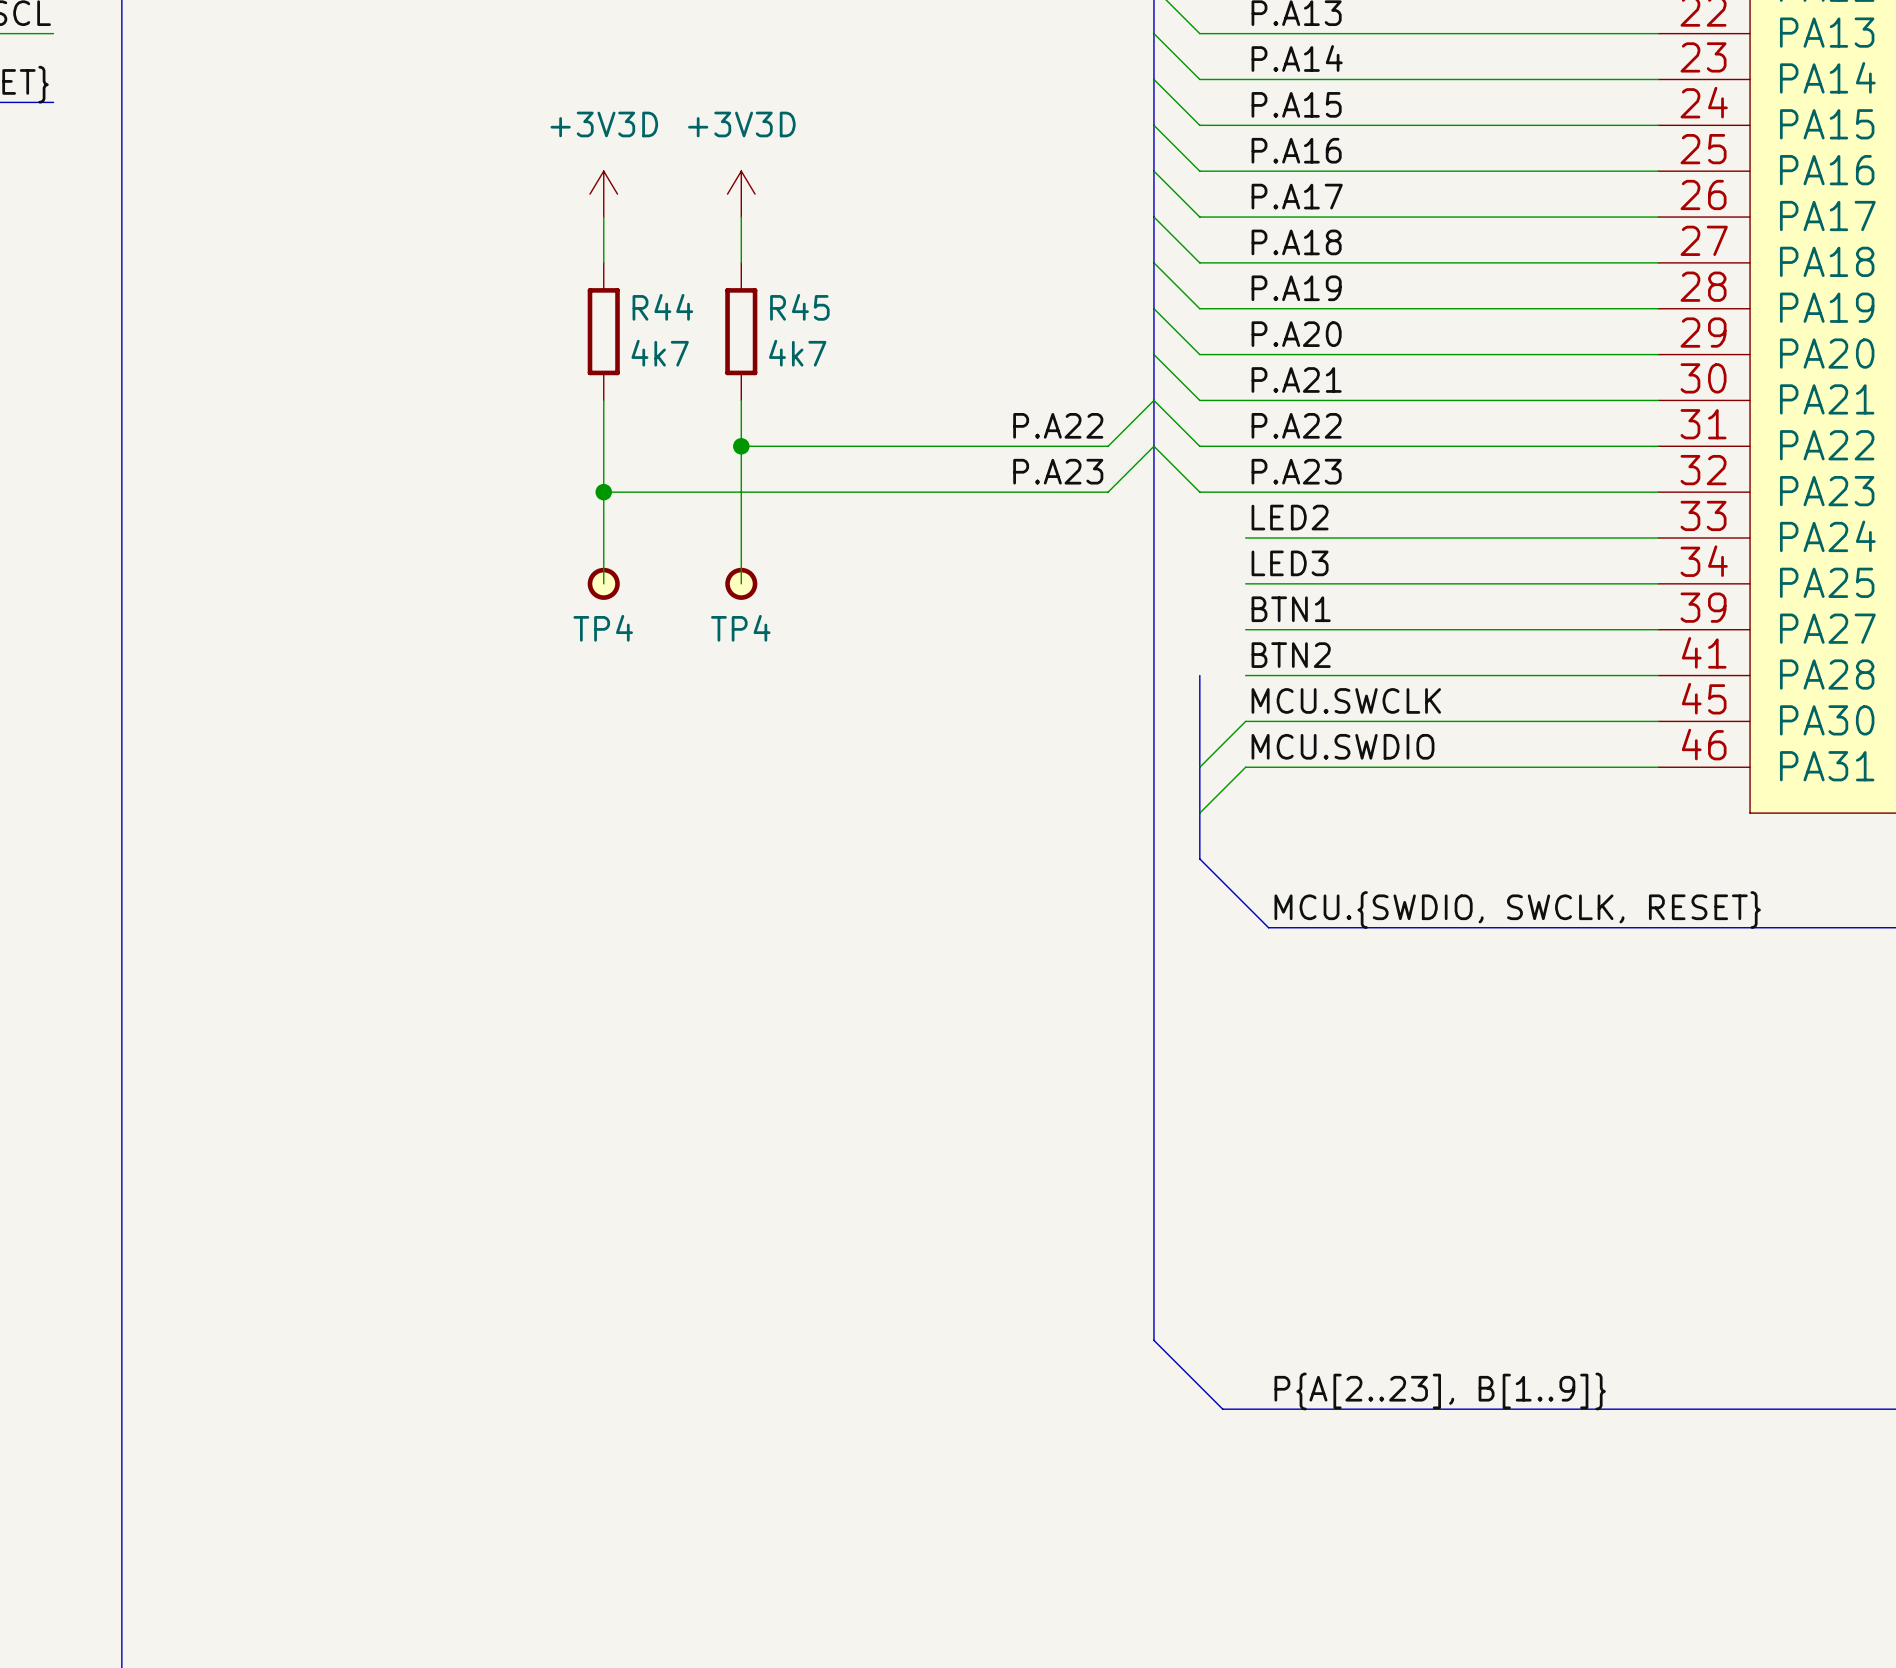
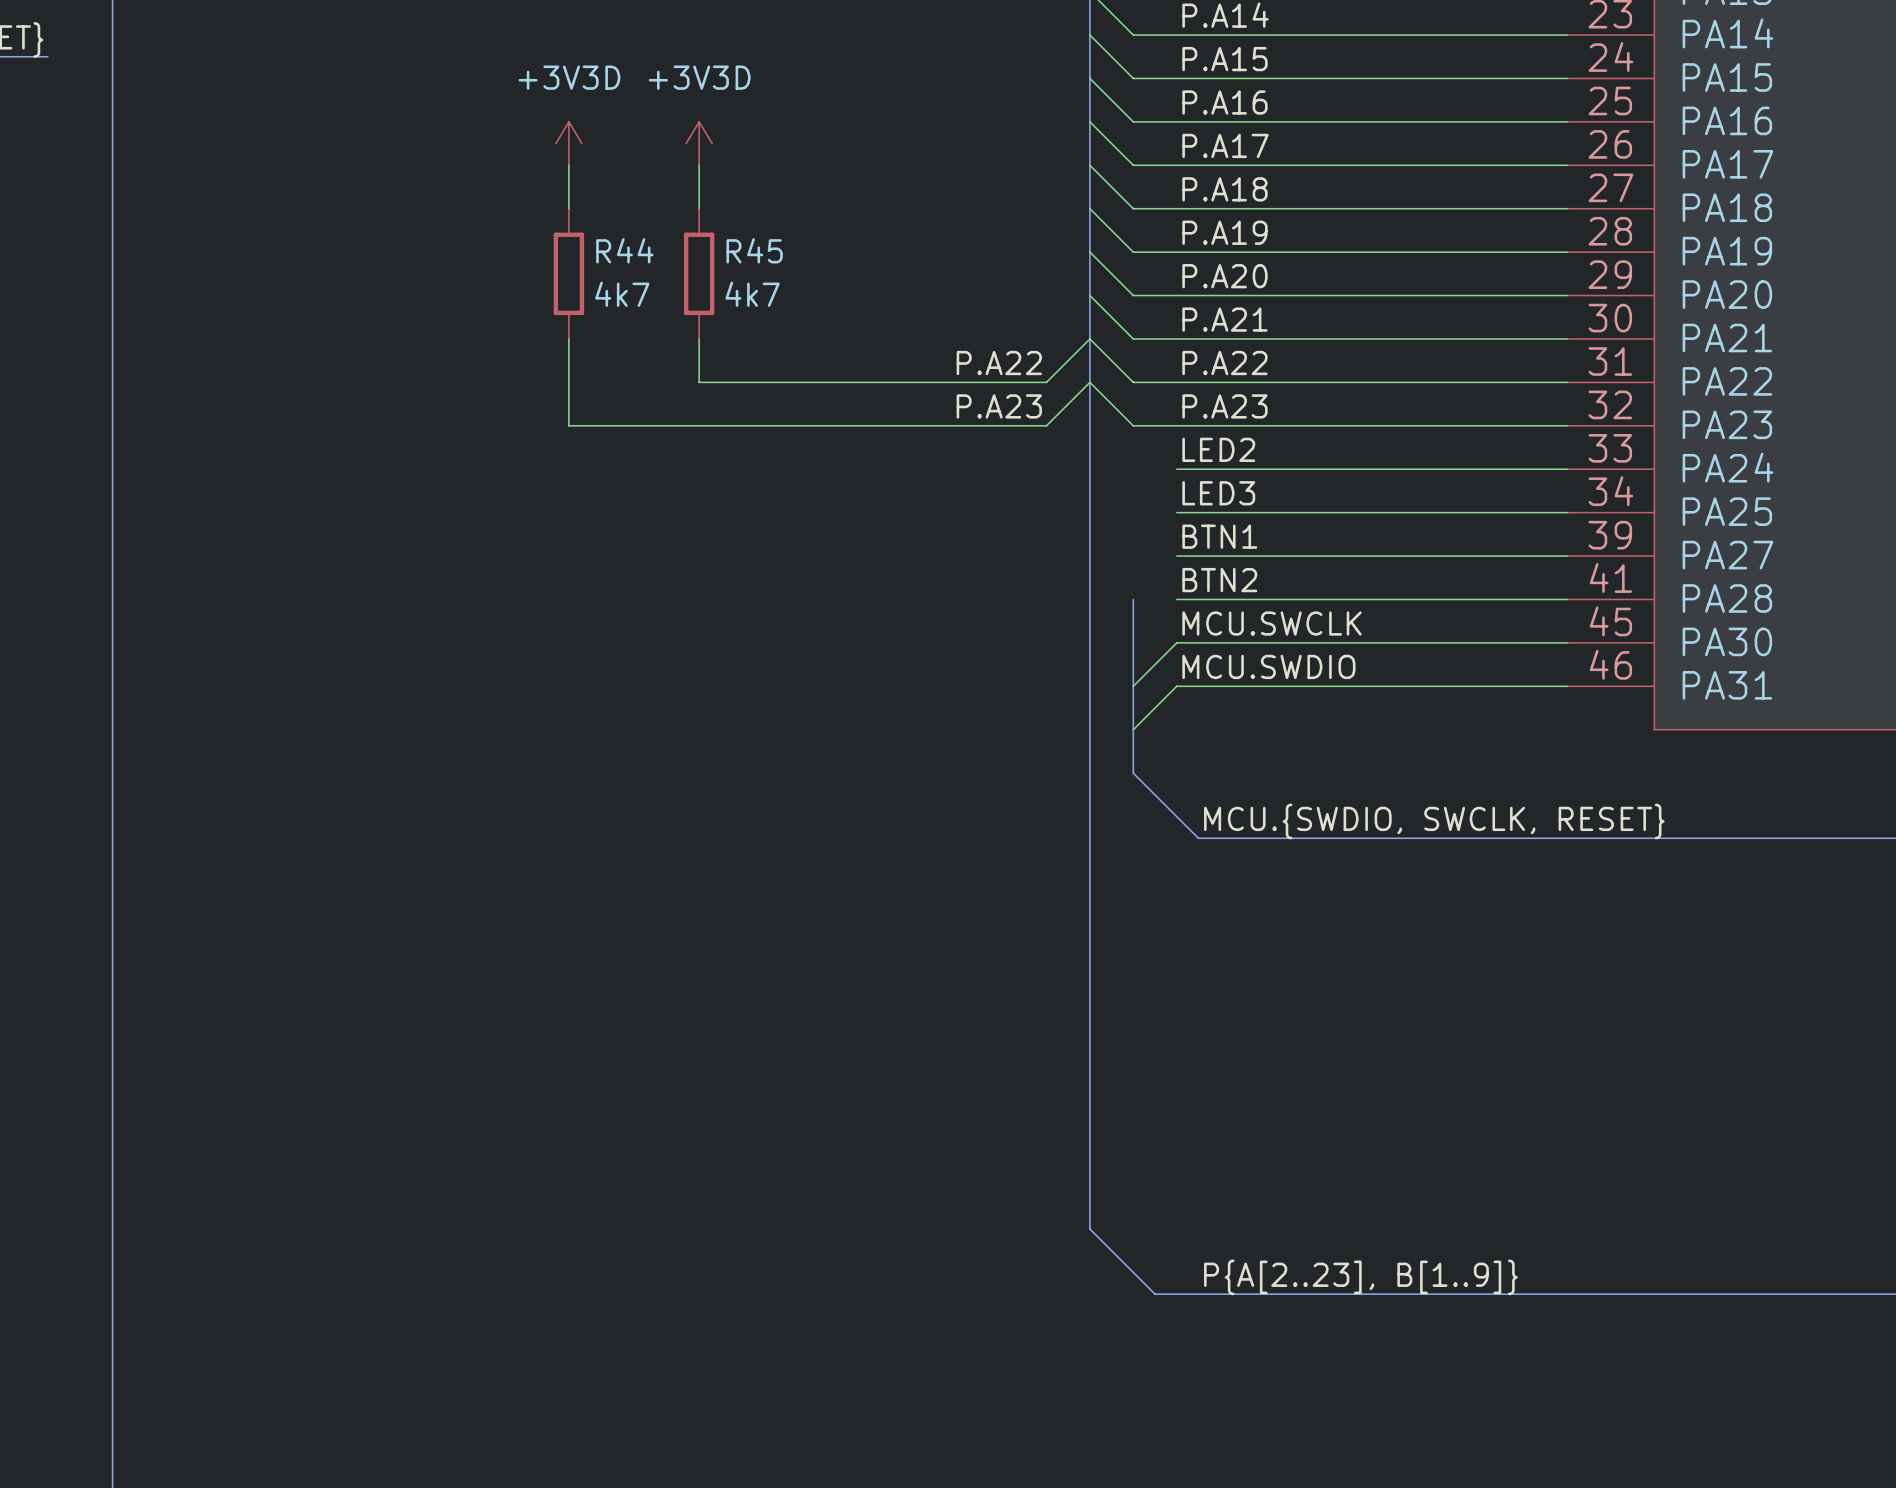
wire: (741, 446) (741, 583) -> none
junction: (741, 446) -> none
wire: (603, 492) (603, 583) -> none
junction: (603, 492) -> none
TP4: (603, 583) -> none
TP4: (741, 583) -> none

